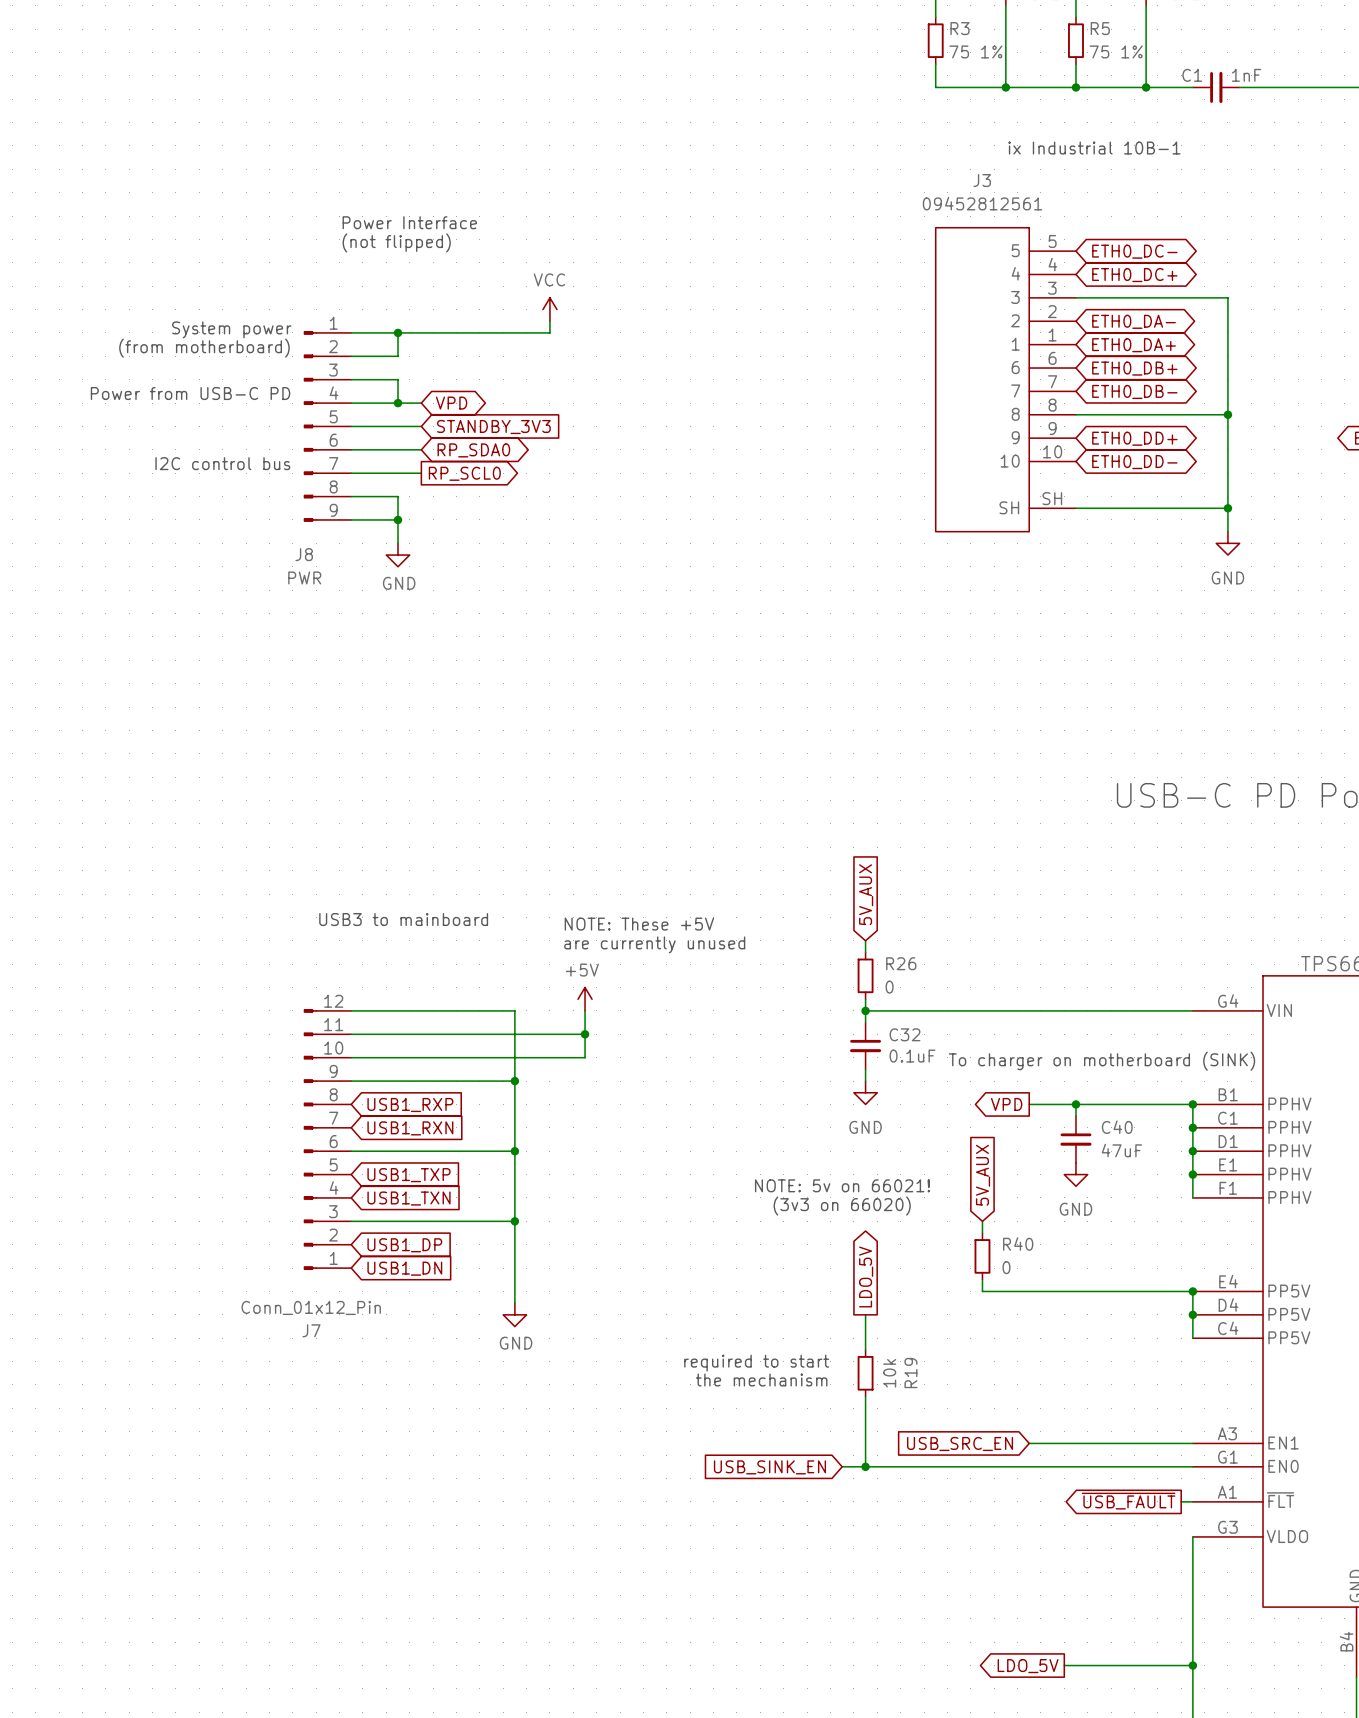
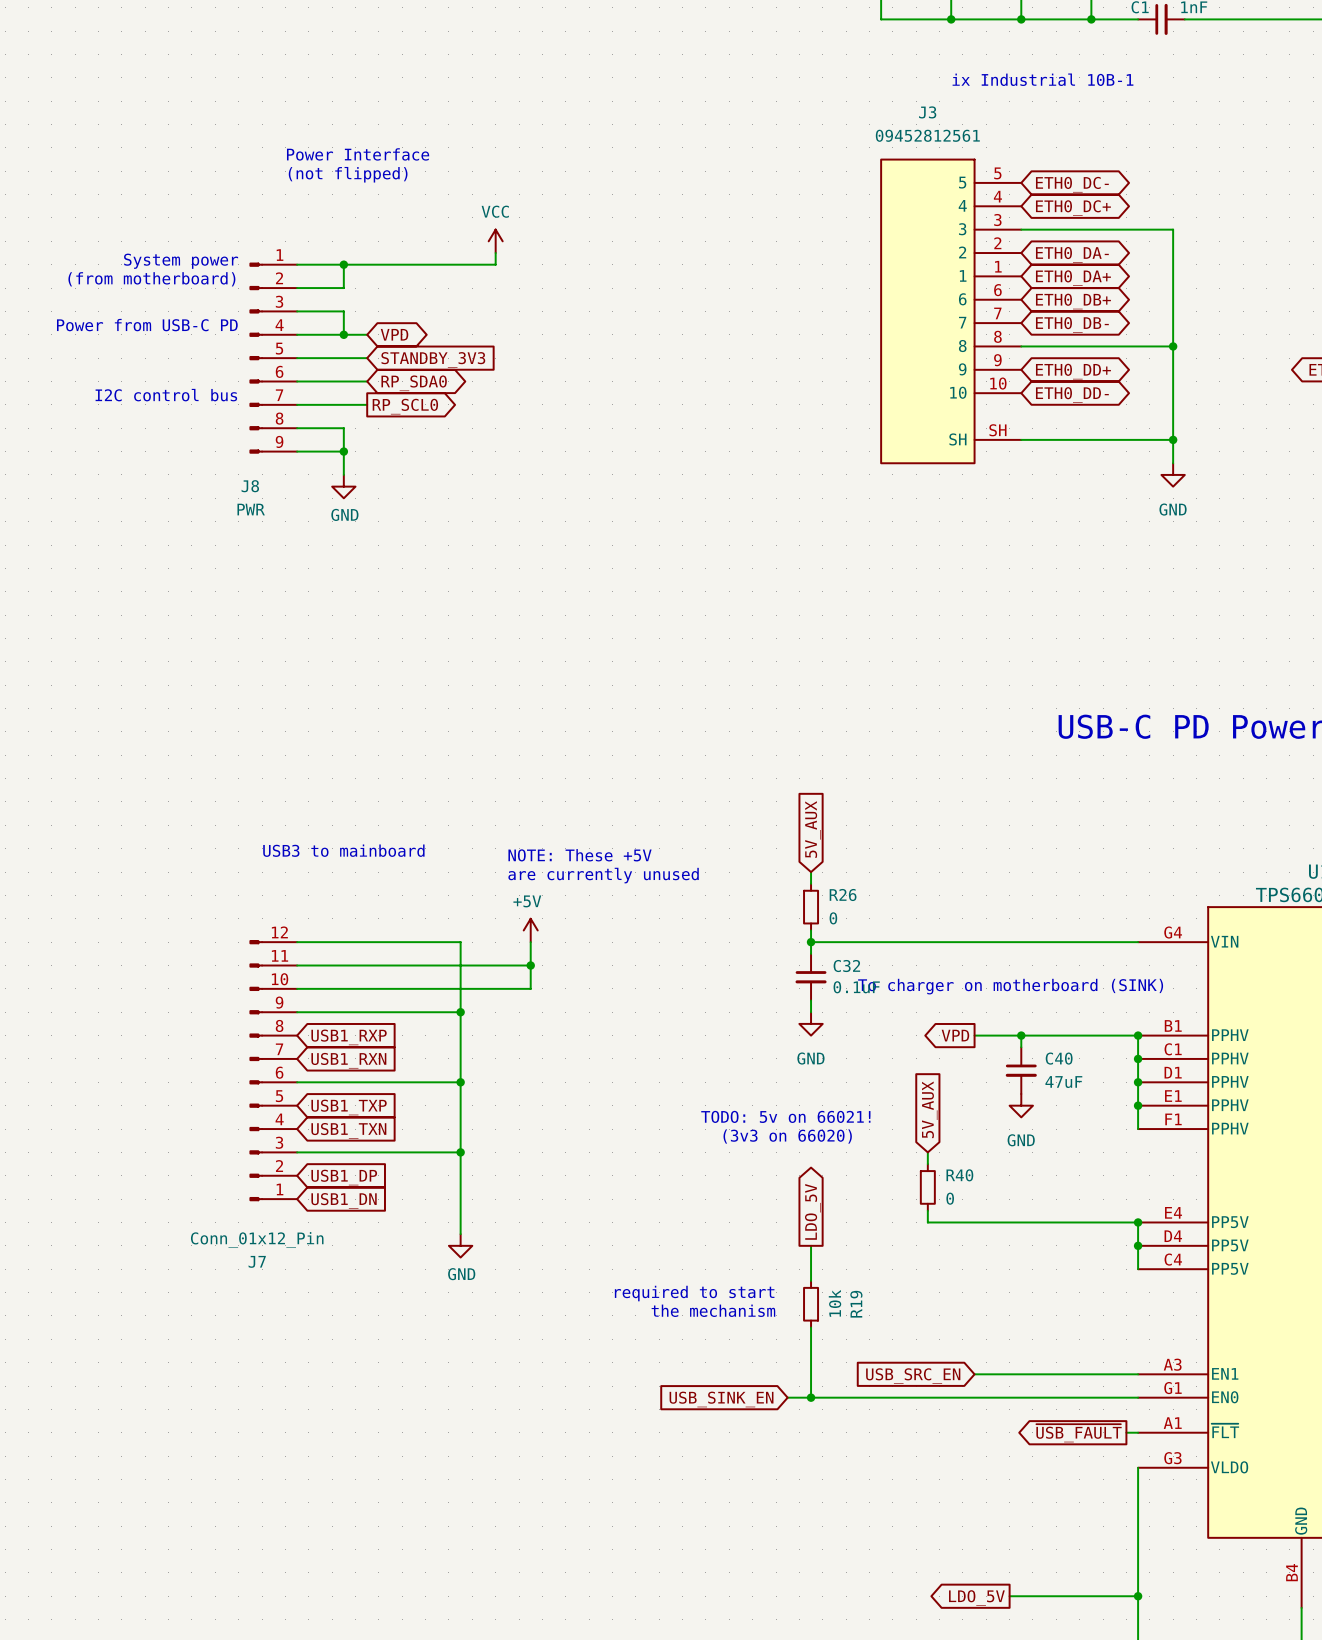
text position: To charger on motherboard (SINK) (1101, 1061) -> To charger on motherboard (SINK) (1010, 986)
text: NOTE: 5v on 66021! (842, 1185) -> TODO: 5v on 66021! (785, 1116)

